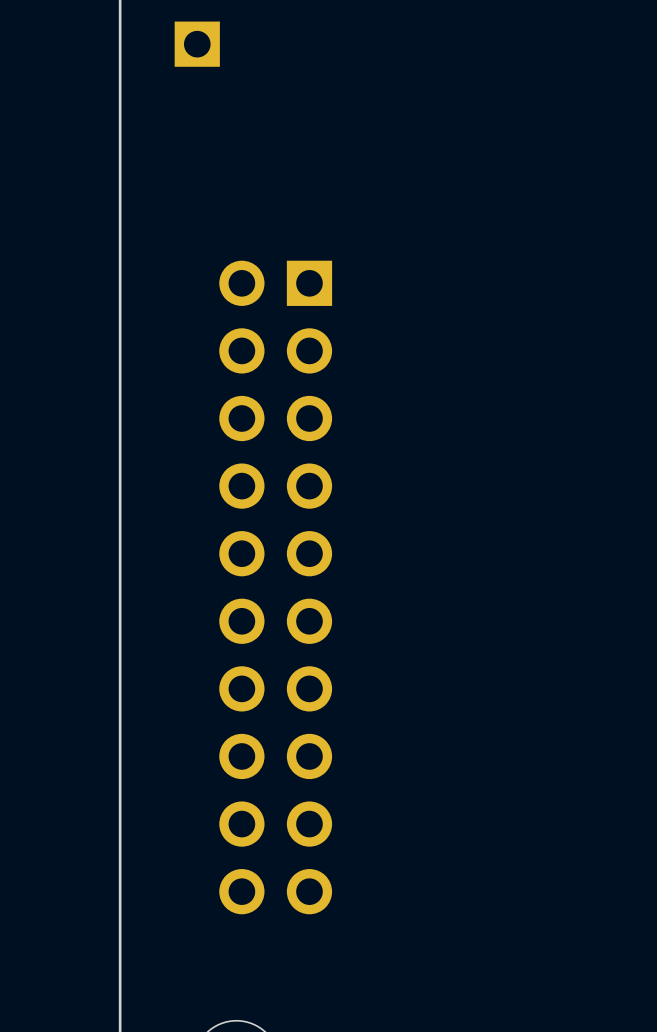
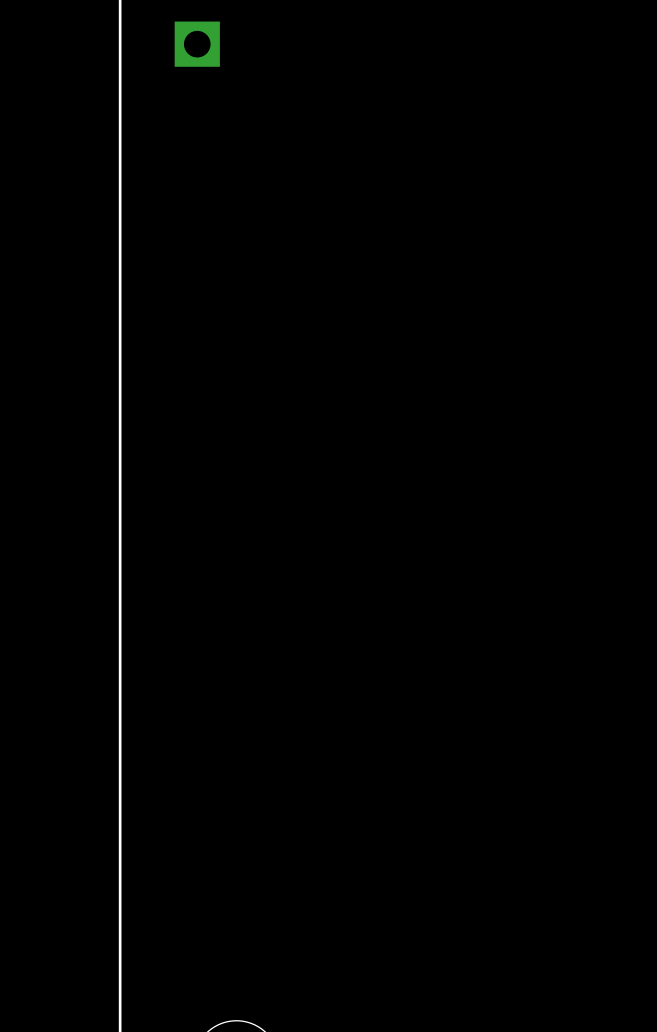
part: (275, 587) -> none

